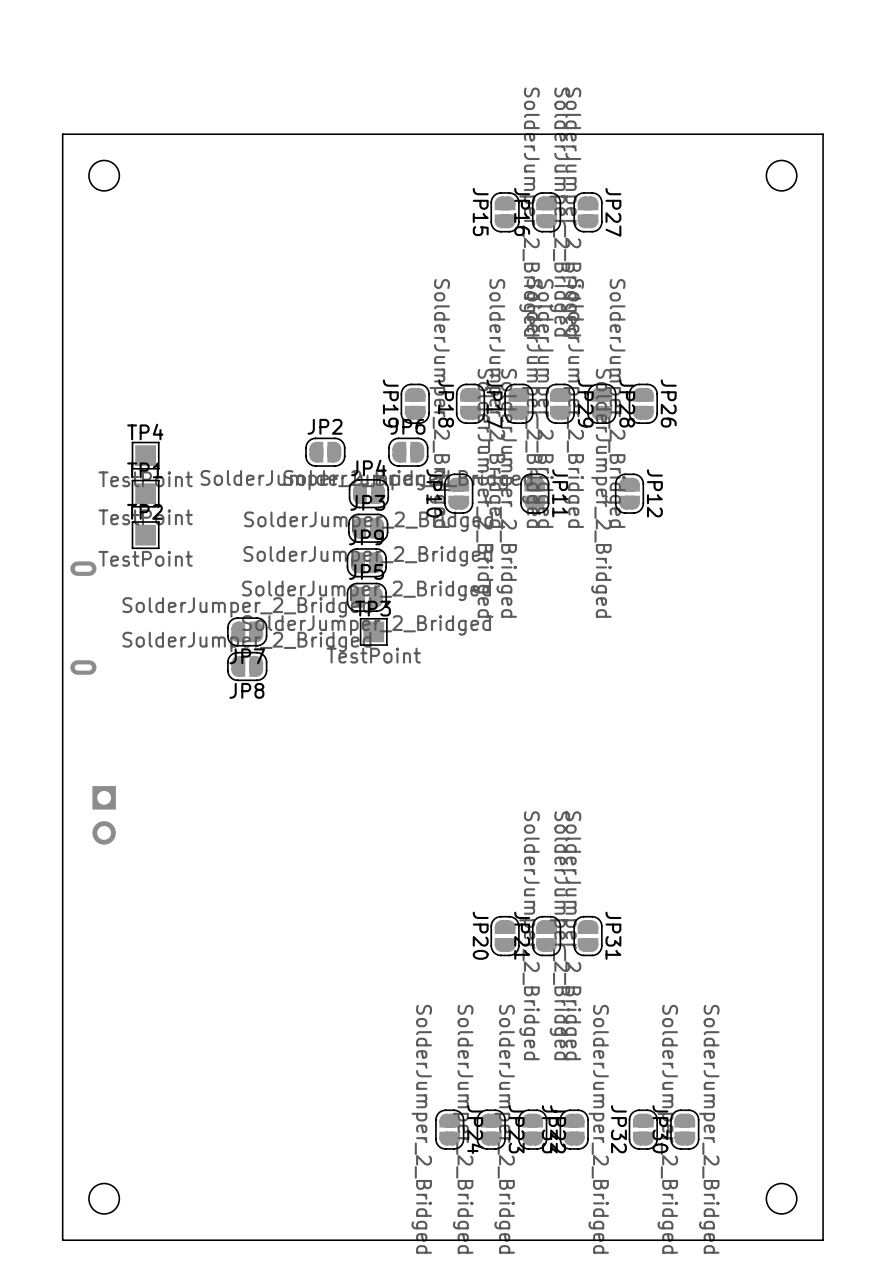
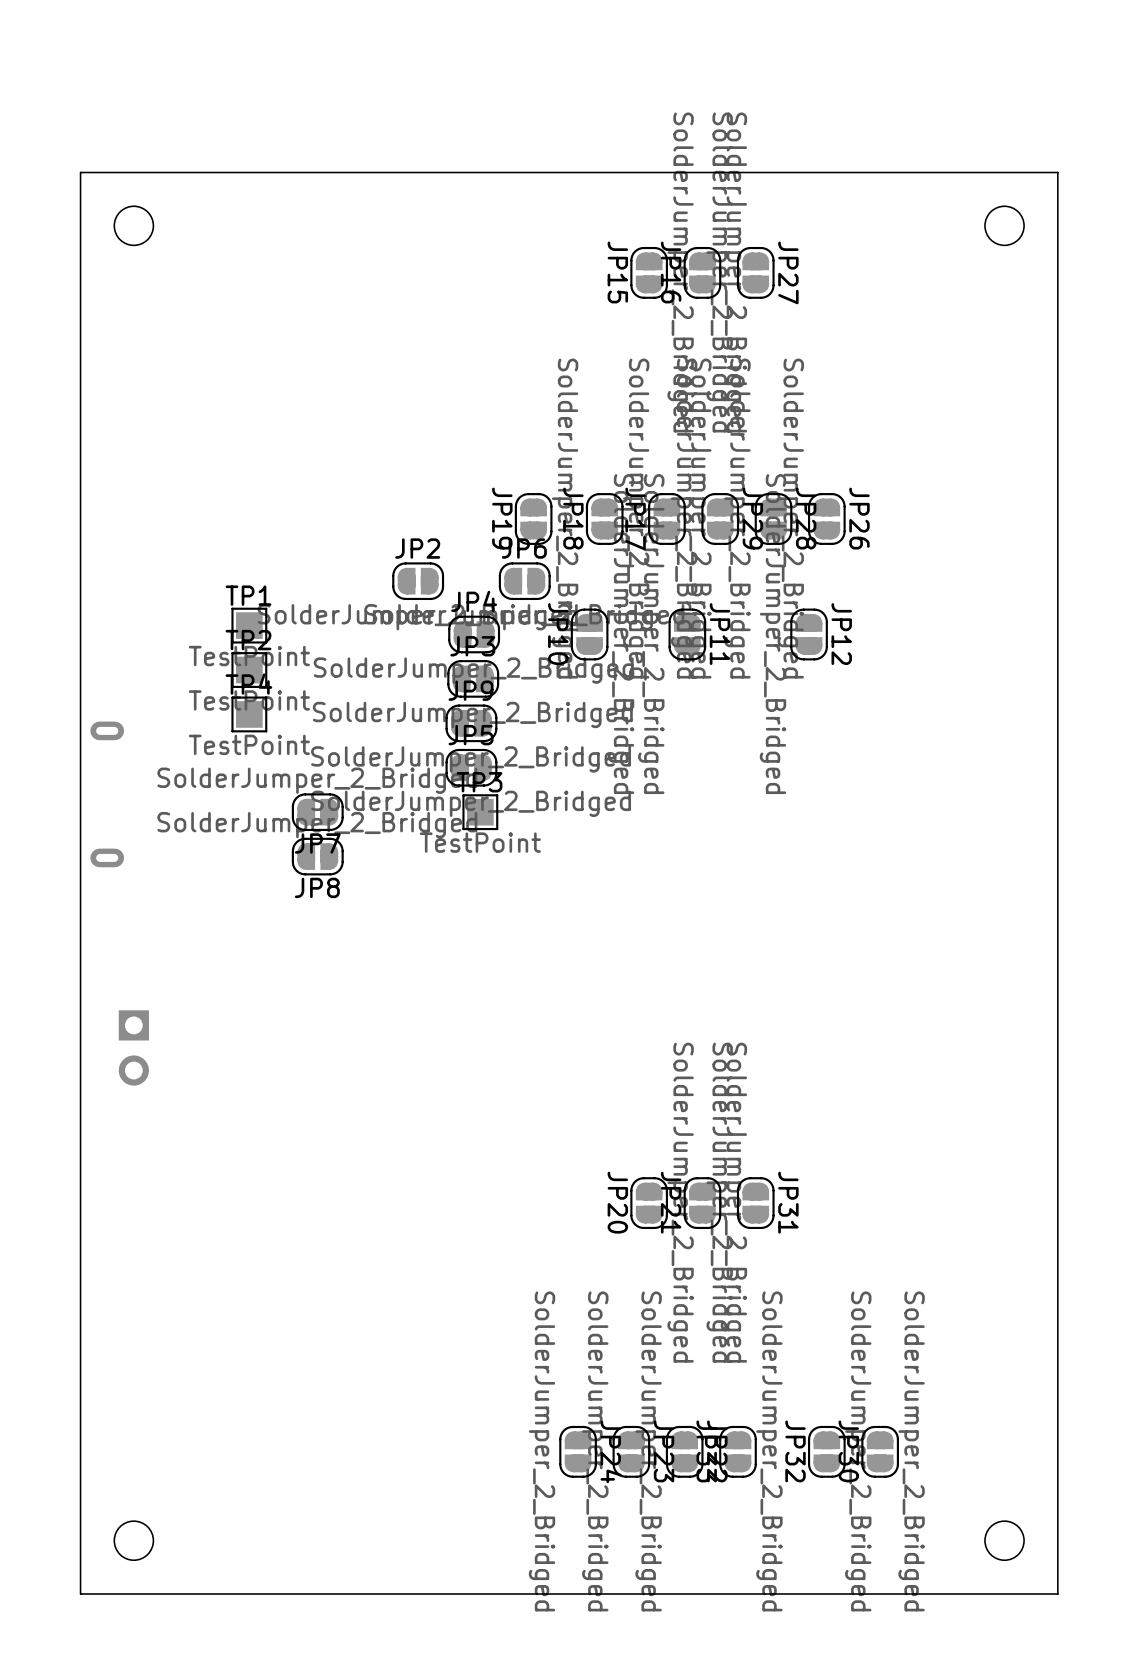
TP4 position: (145, 455) -> (249, 714)
TP1 position: (145, 493) -> (249, 625)
TP2 position: (145, 535) -> (249, 670)

